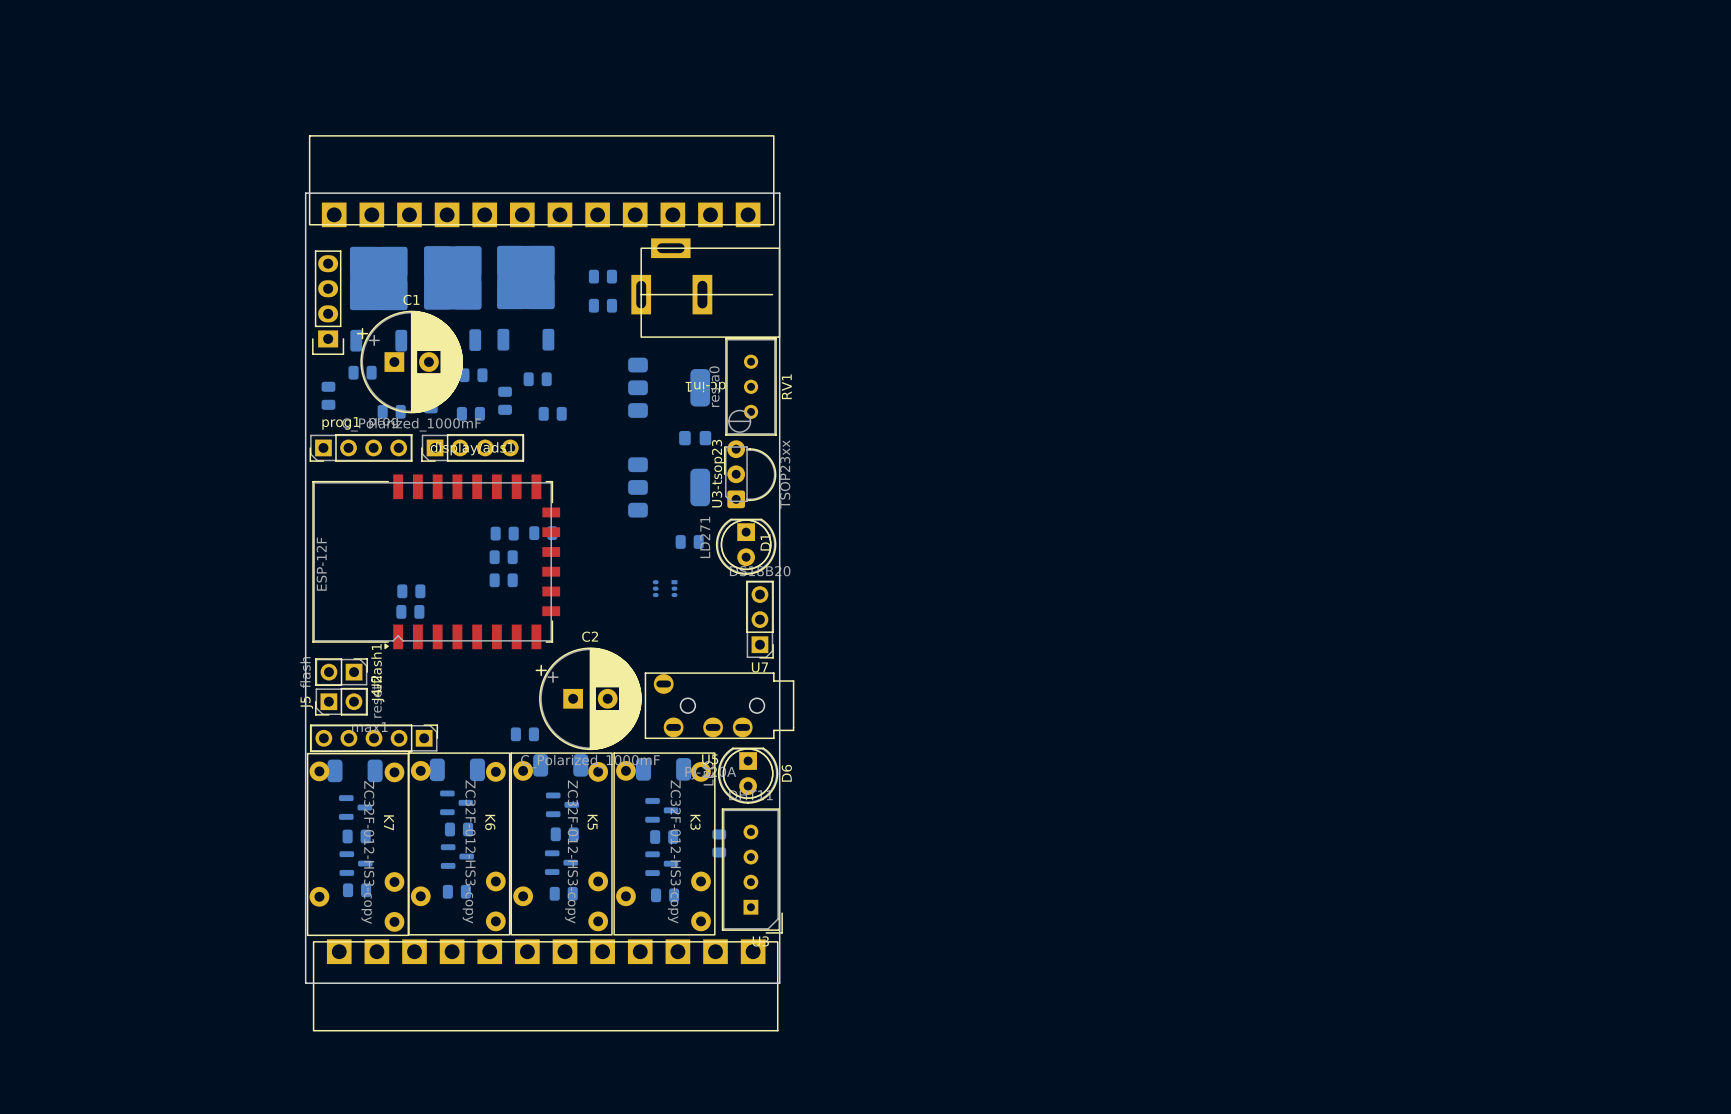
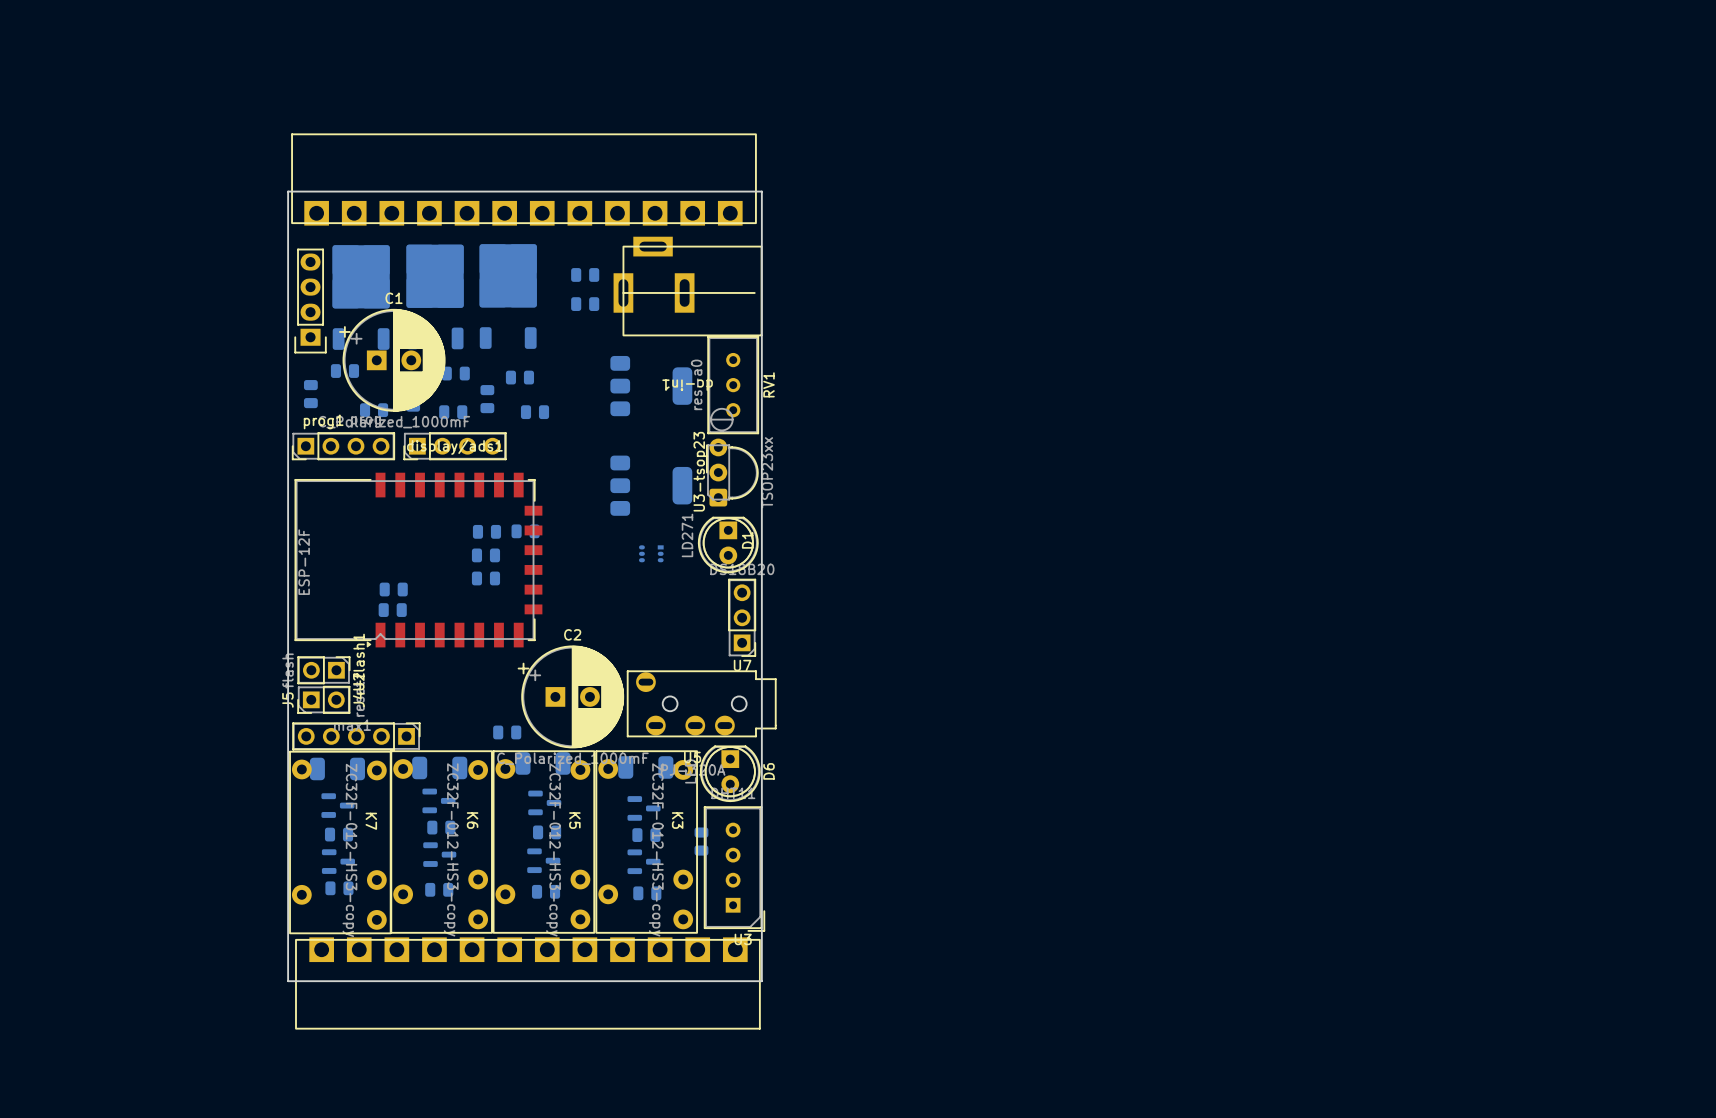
part: (695, 438) -> none
part: (689, 541) -> none
part position: (665, 588) -> (651, 553)

